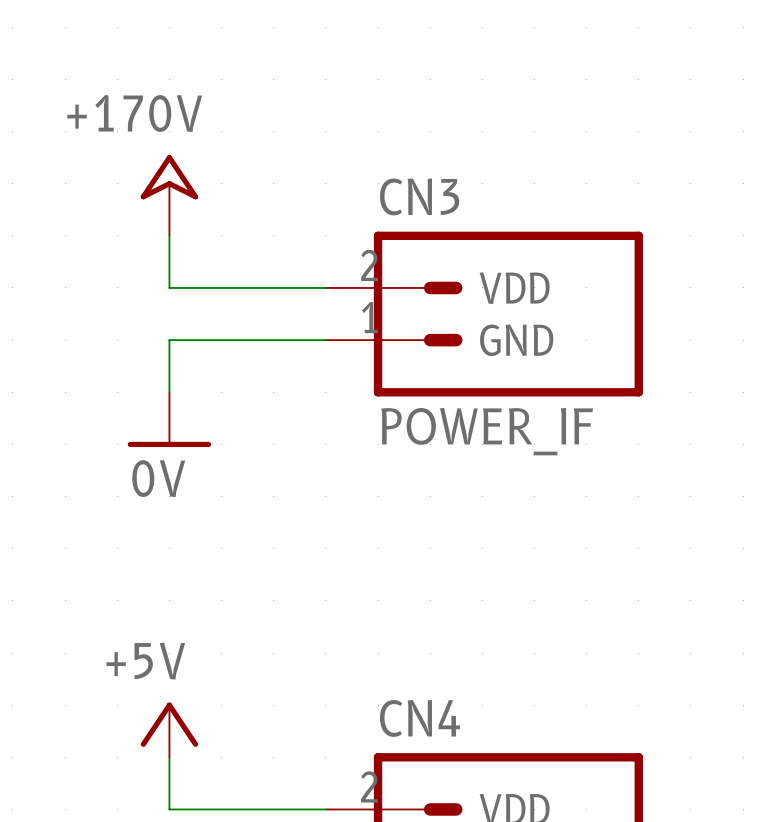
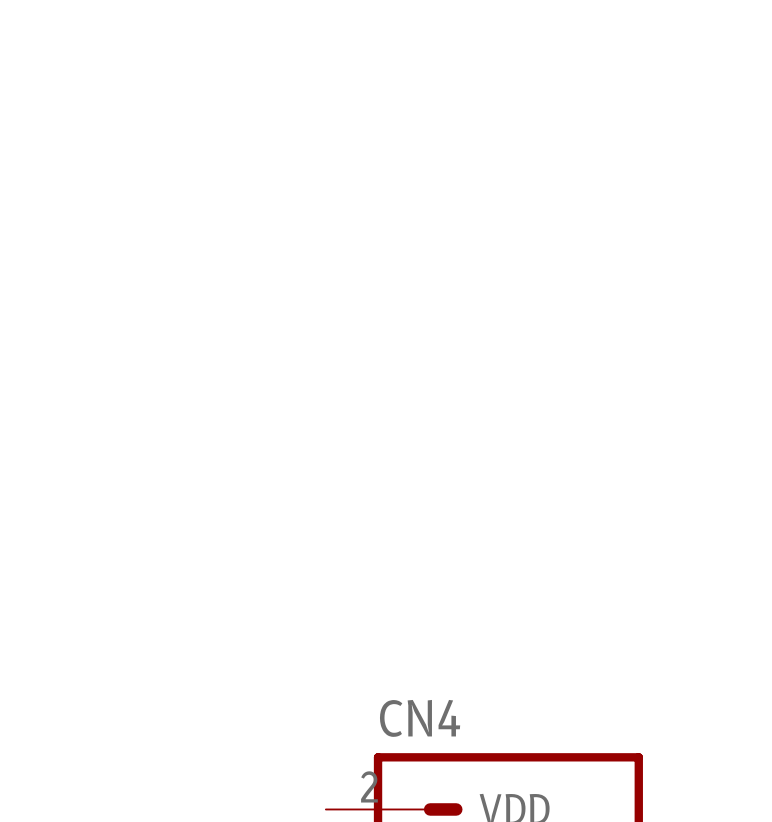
power symbol: +170V (169, 195) -> none
wire: (169, 235) (169, 287) (325, 287) -> none
CN3: POWER_IF (484, 314) -> none
wire: (325, 340) (169, 340) (169, 392) -> none
power symbol: 0V (169, 419) -> none
power symbol: +5V (169, 729) -> none
wire: (169, 757) (169, 809) (325, 809) -> none

